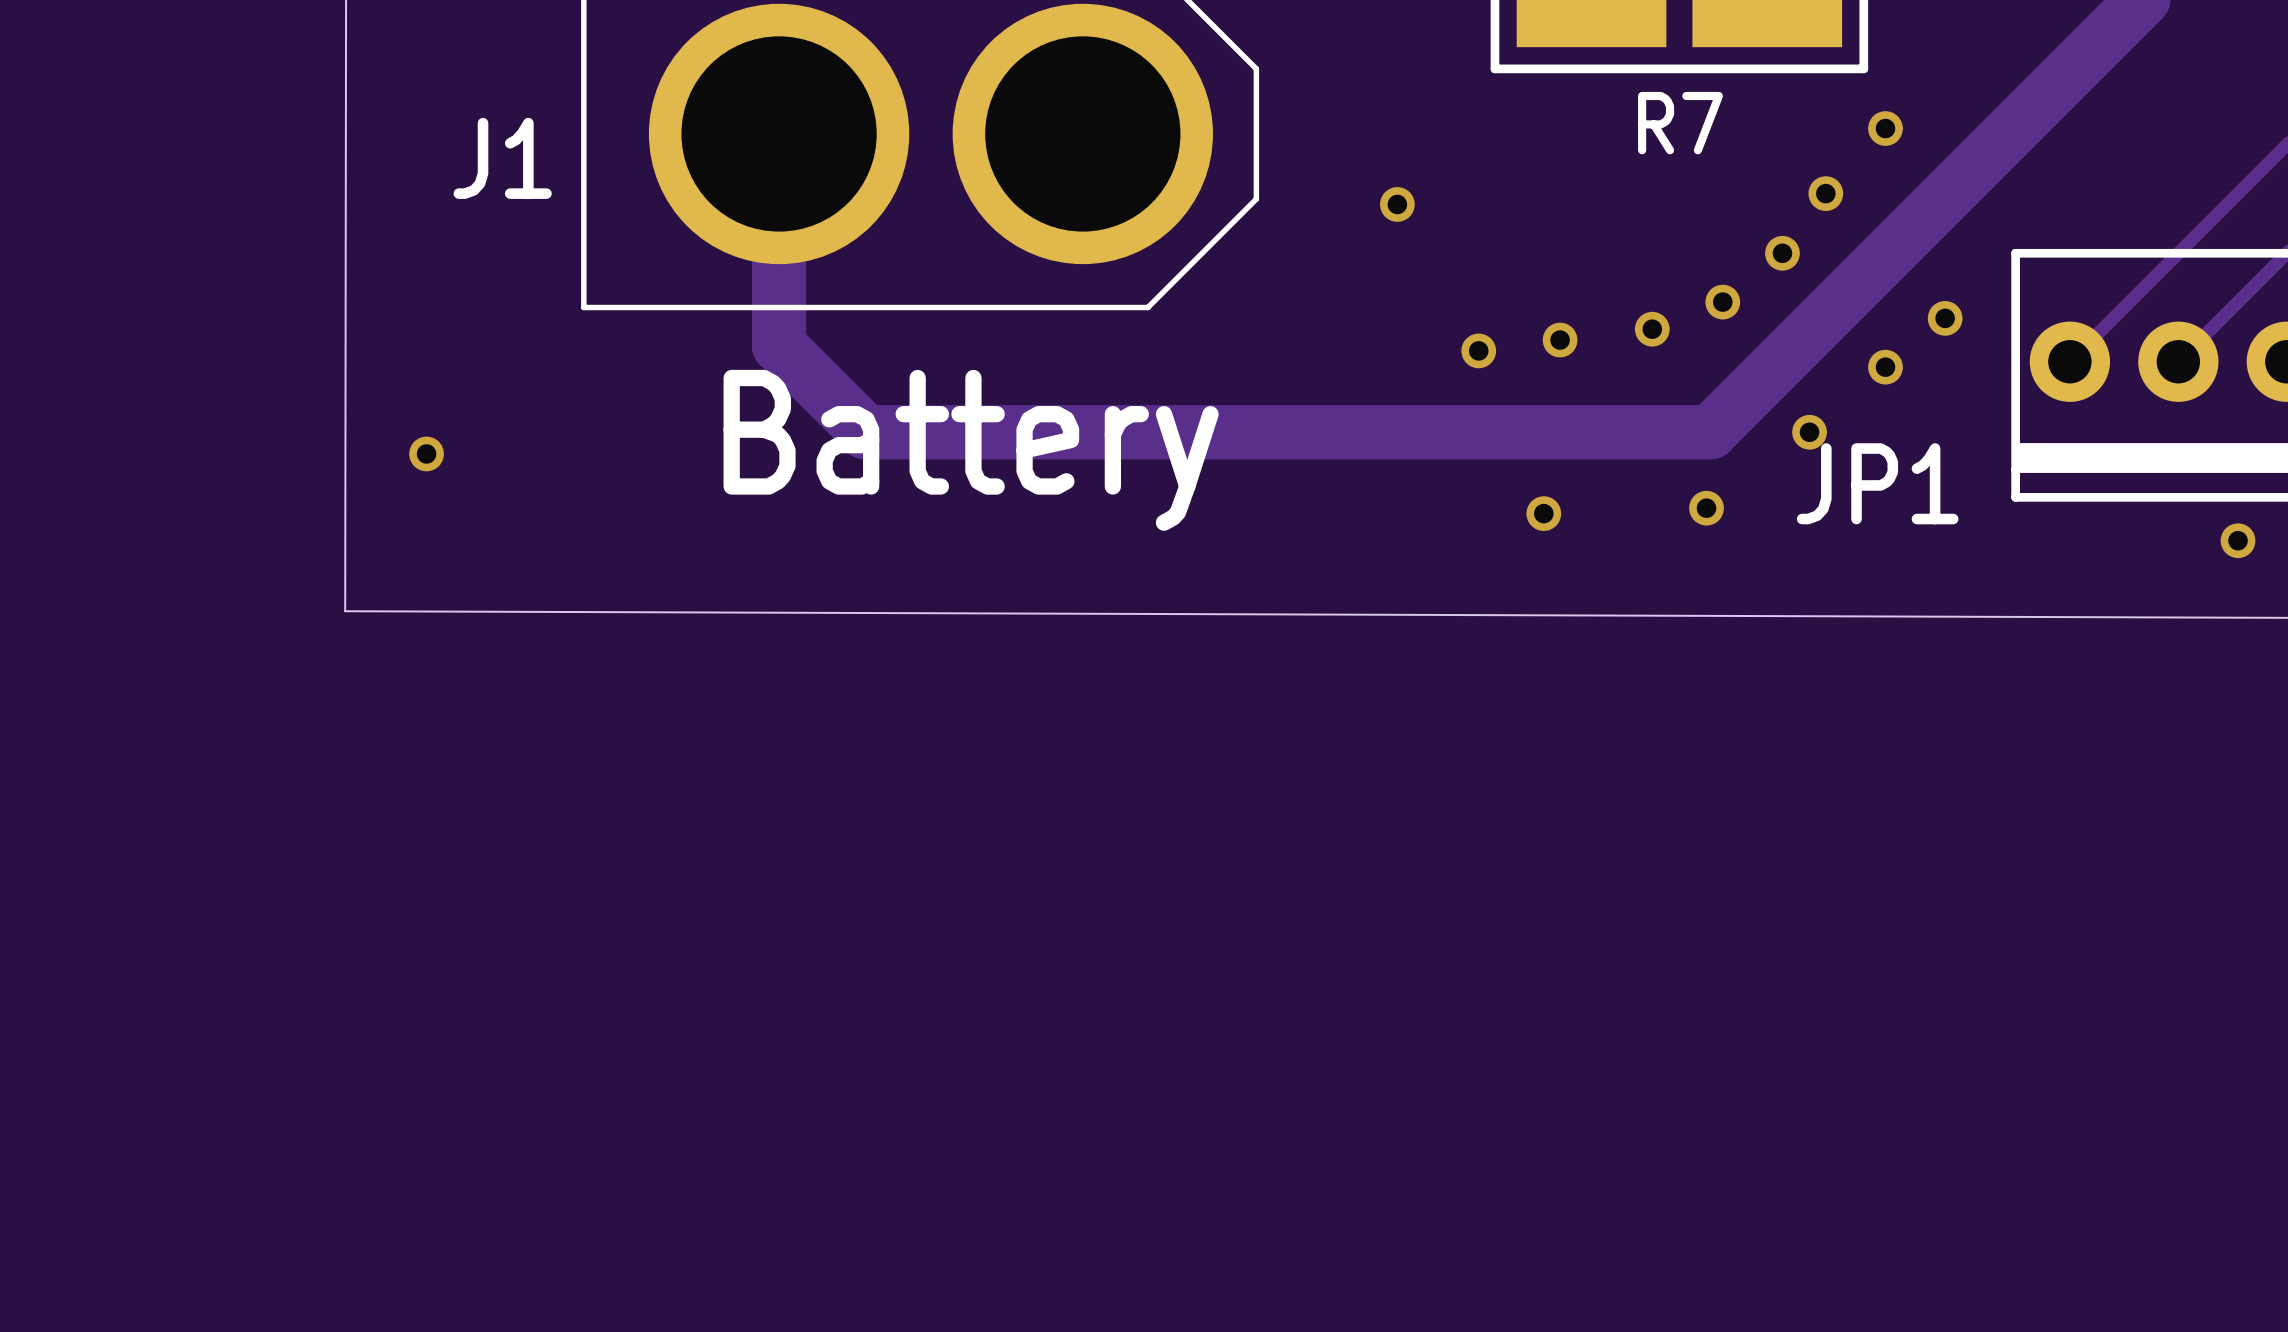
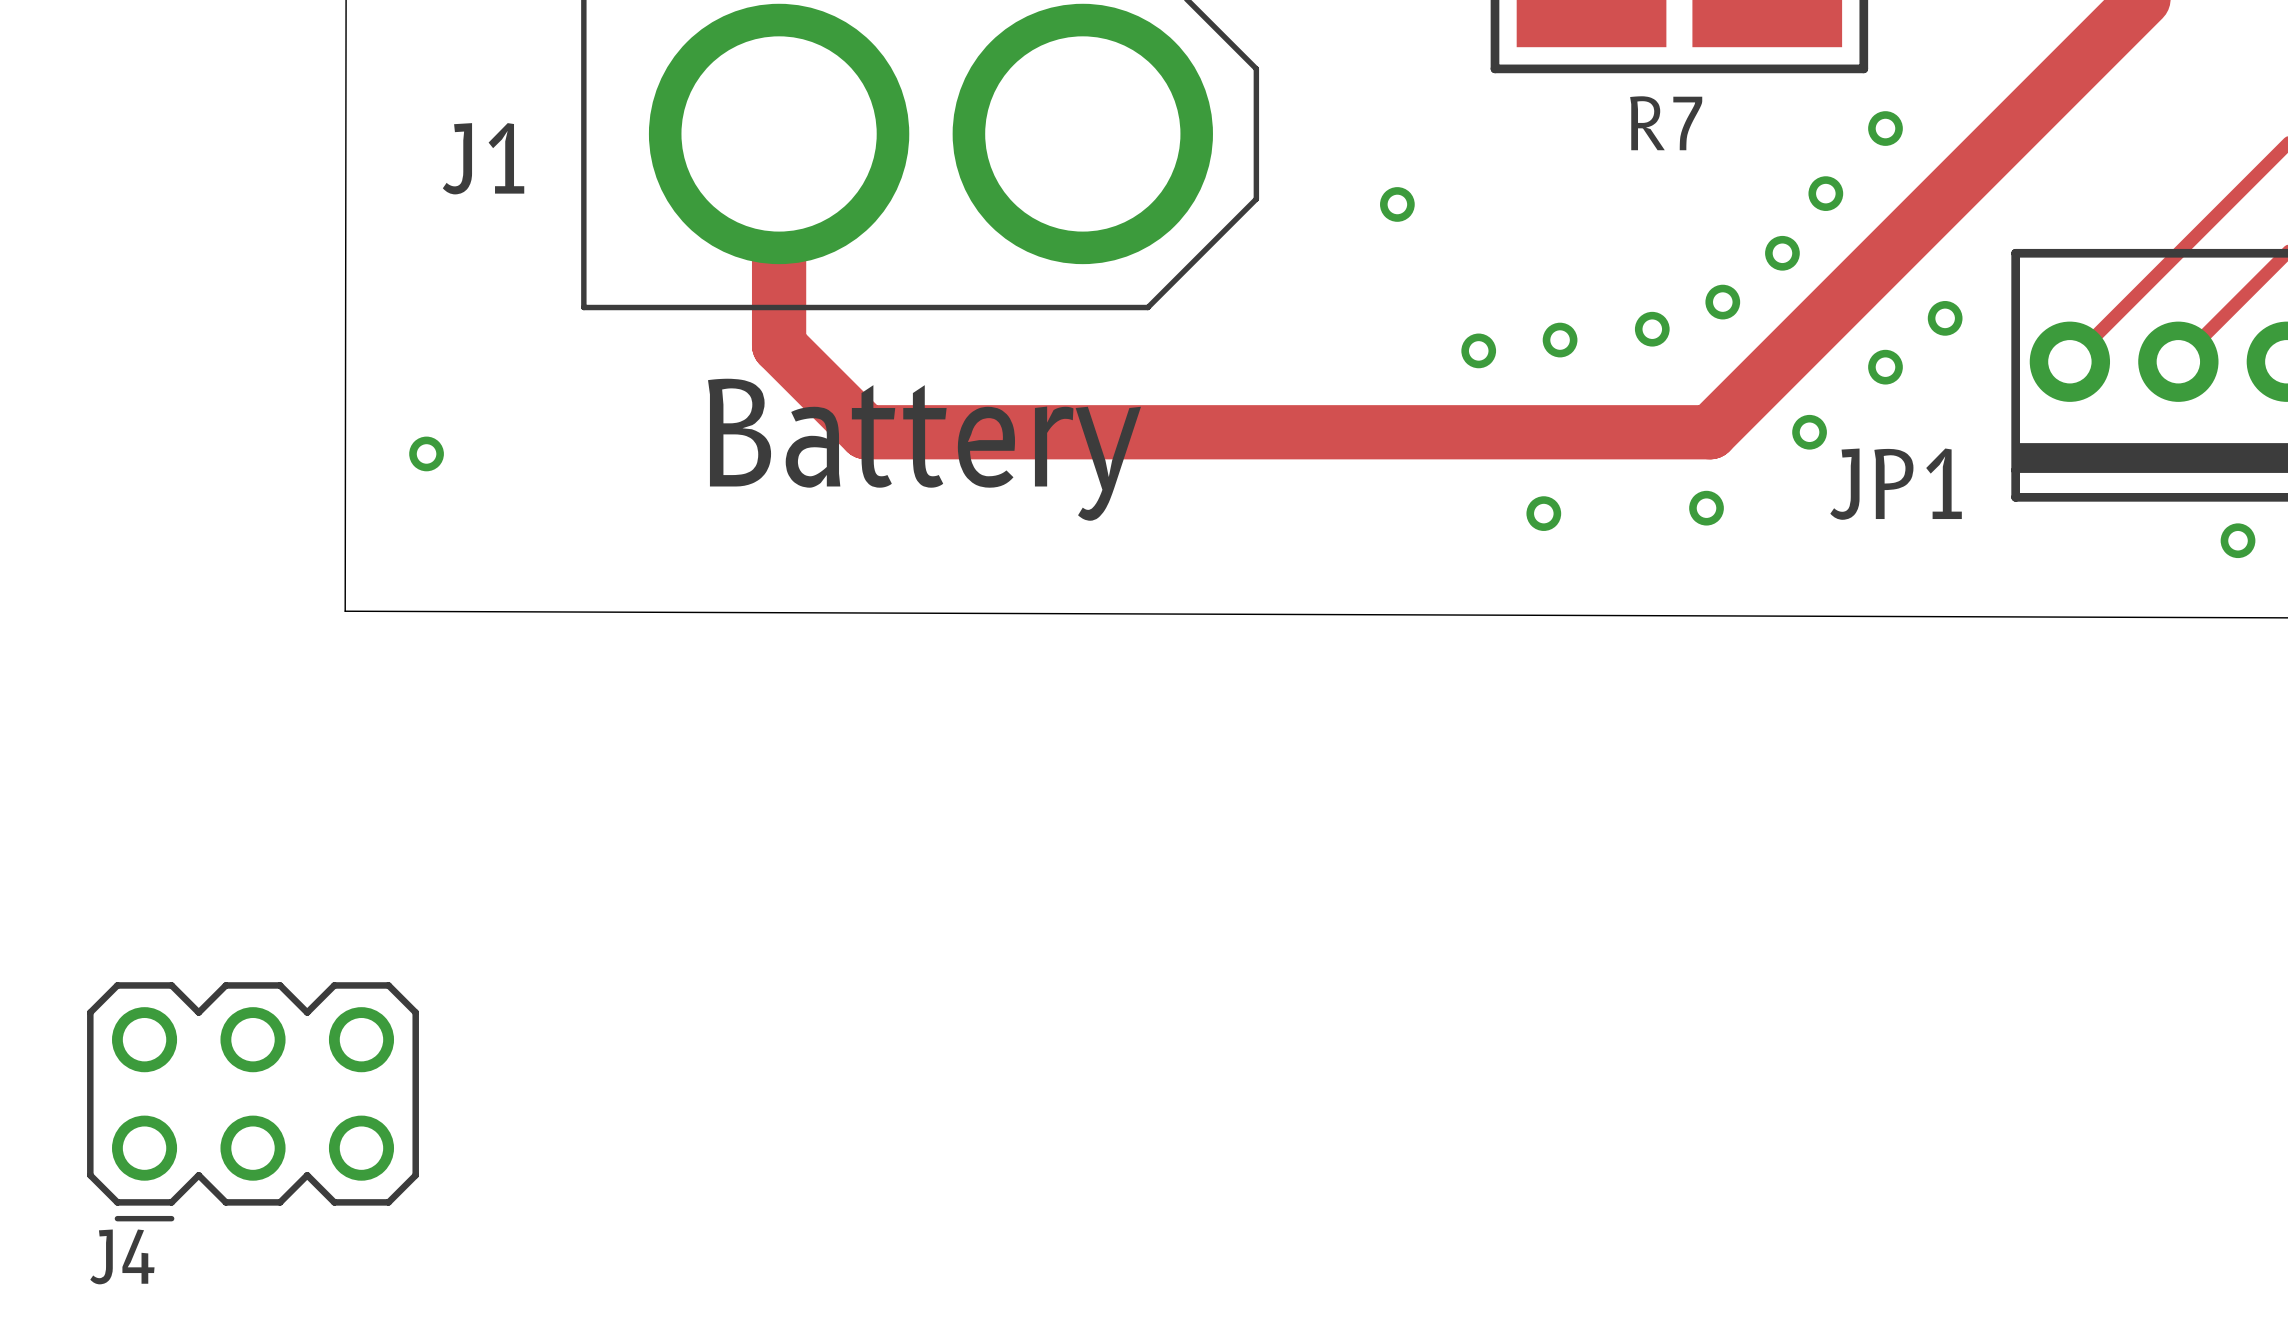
J4: none -> (253, 1101)

